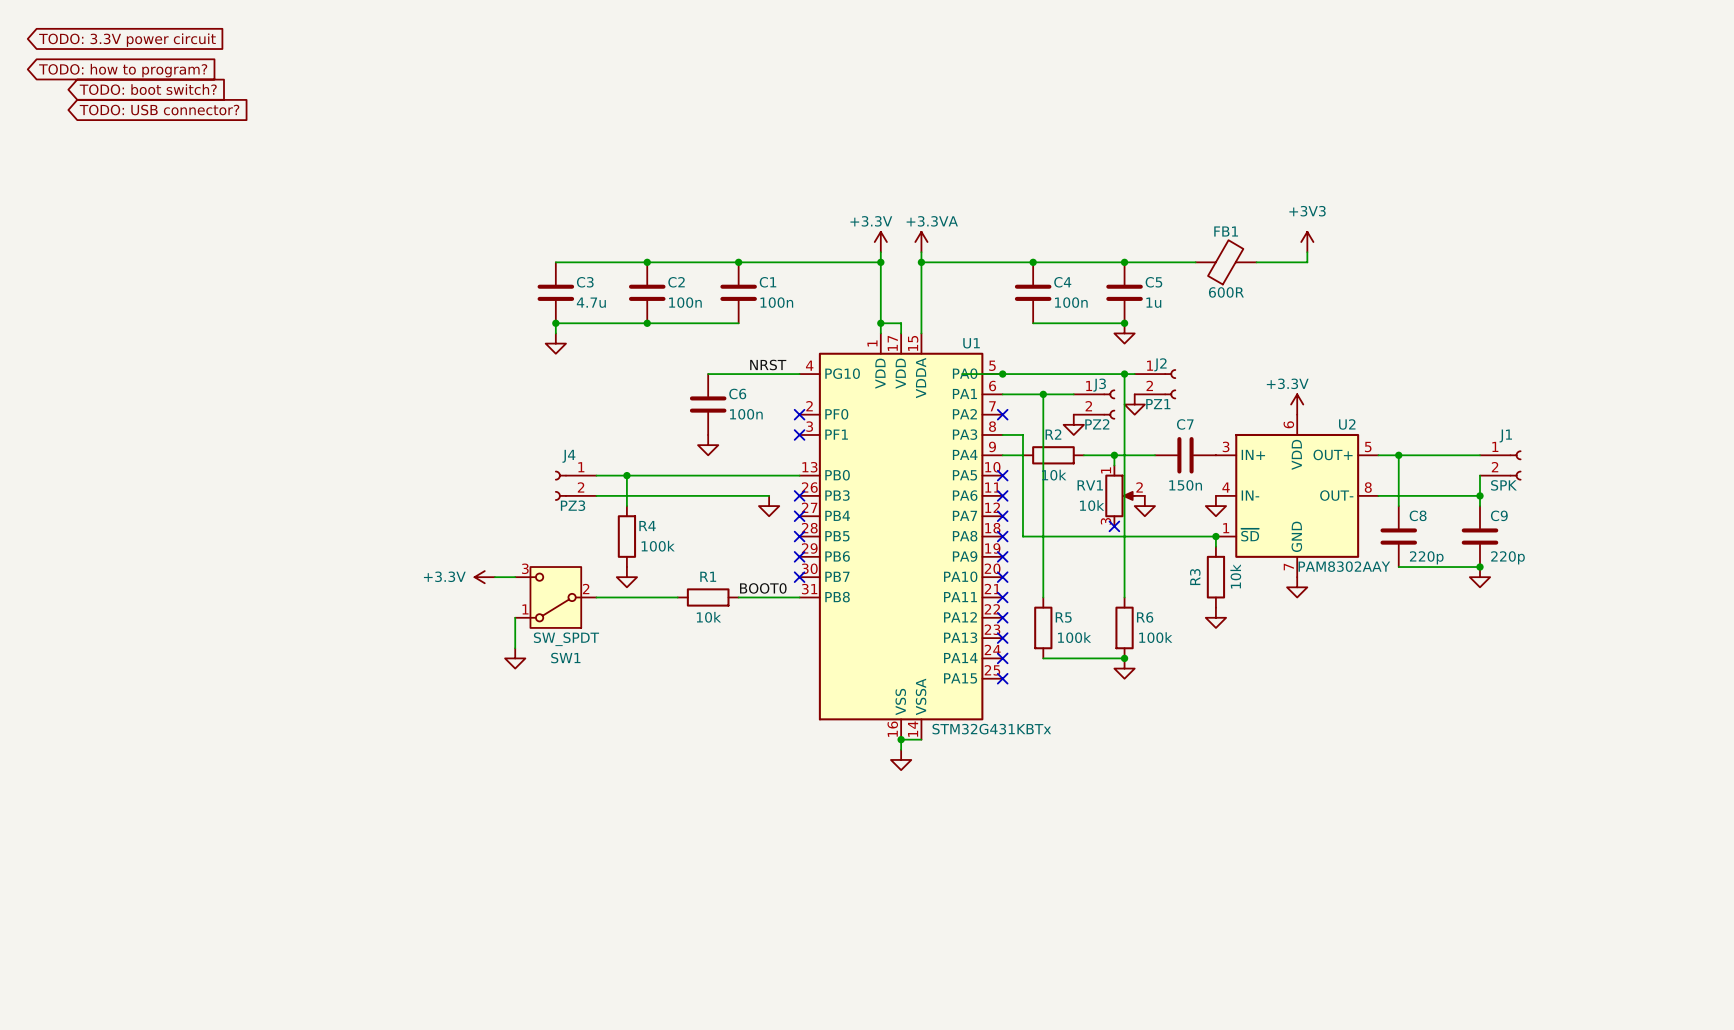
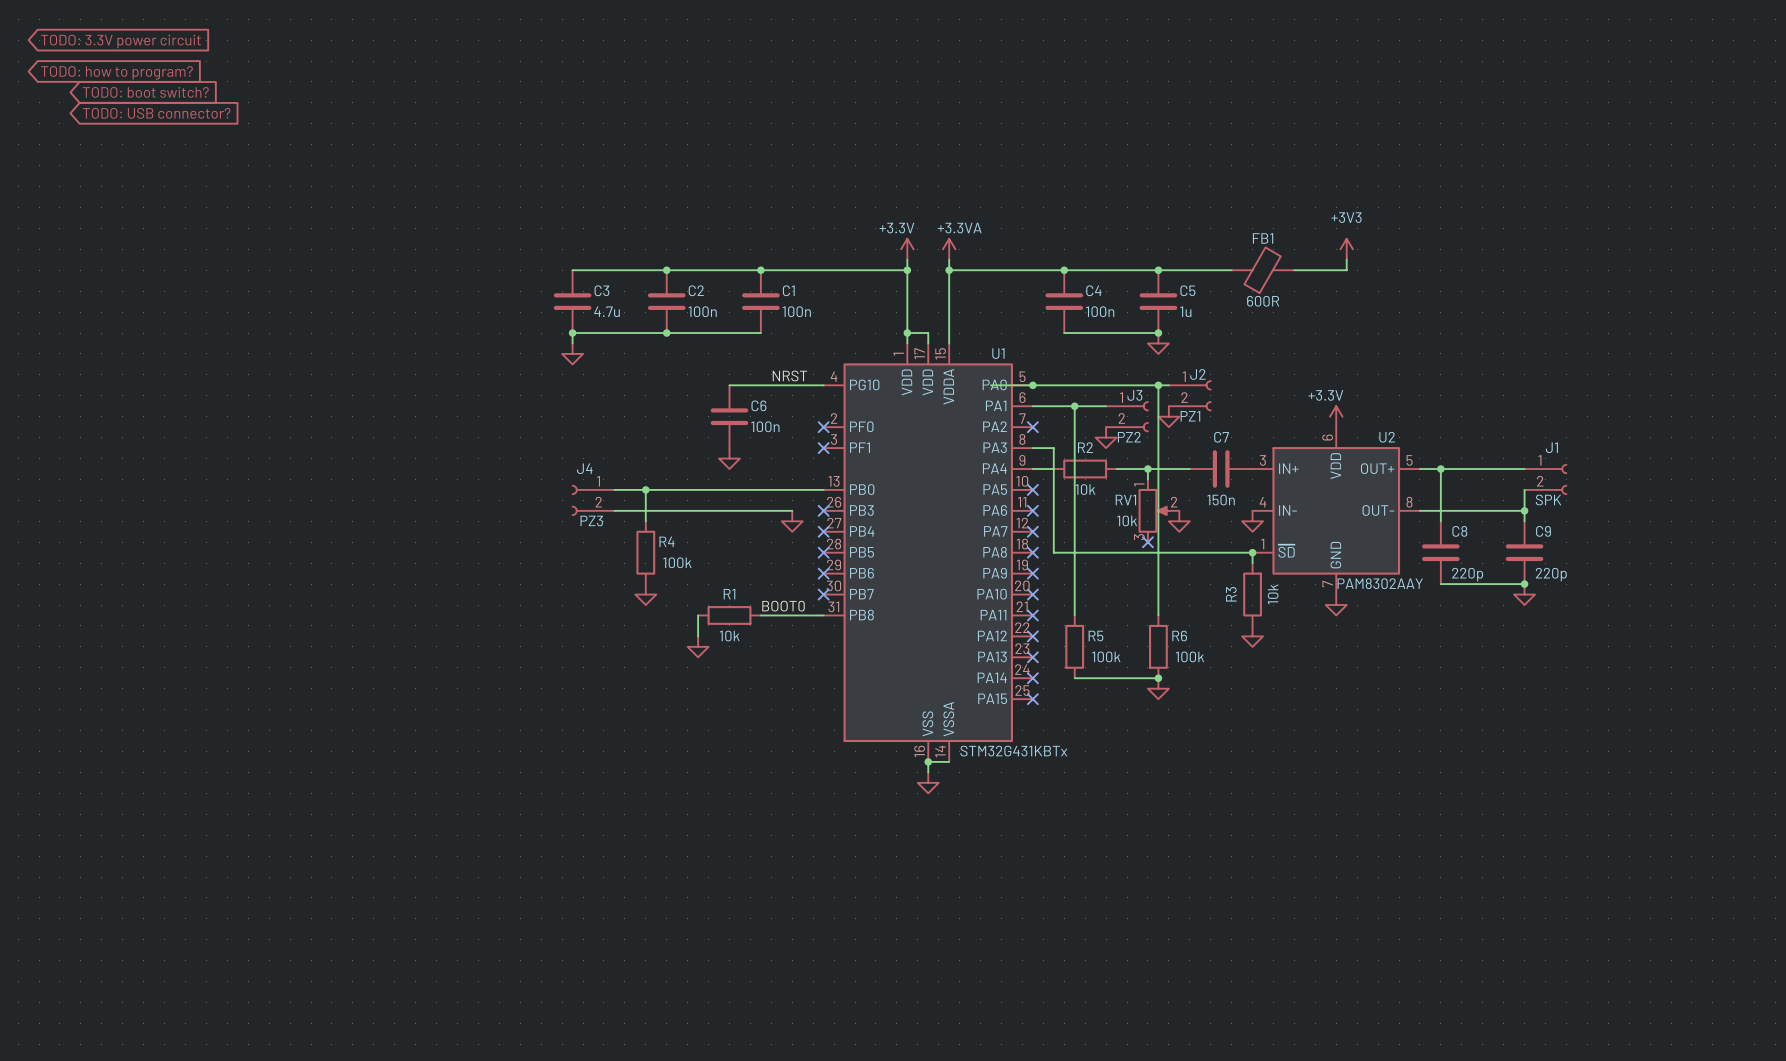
power symbol: +3.3V (484, 577) -> none
wire: (494, 577) (515, 577) -> none
SW1: SW_SPDT (555, 597) -> none
wire: (596, 597) (677, 597) -> (698, 636) (698, 615)
wire: (515, 617) (515, 648) -> none
power symbol position: (515, 658) -> (698, 646)

